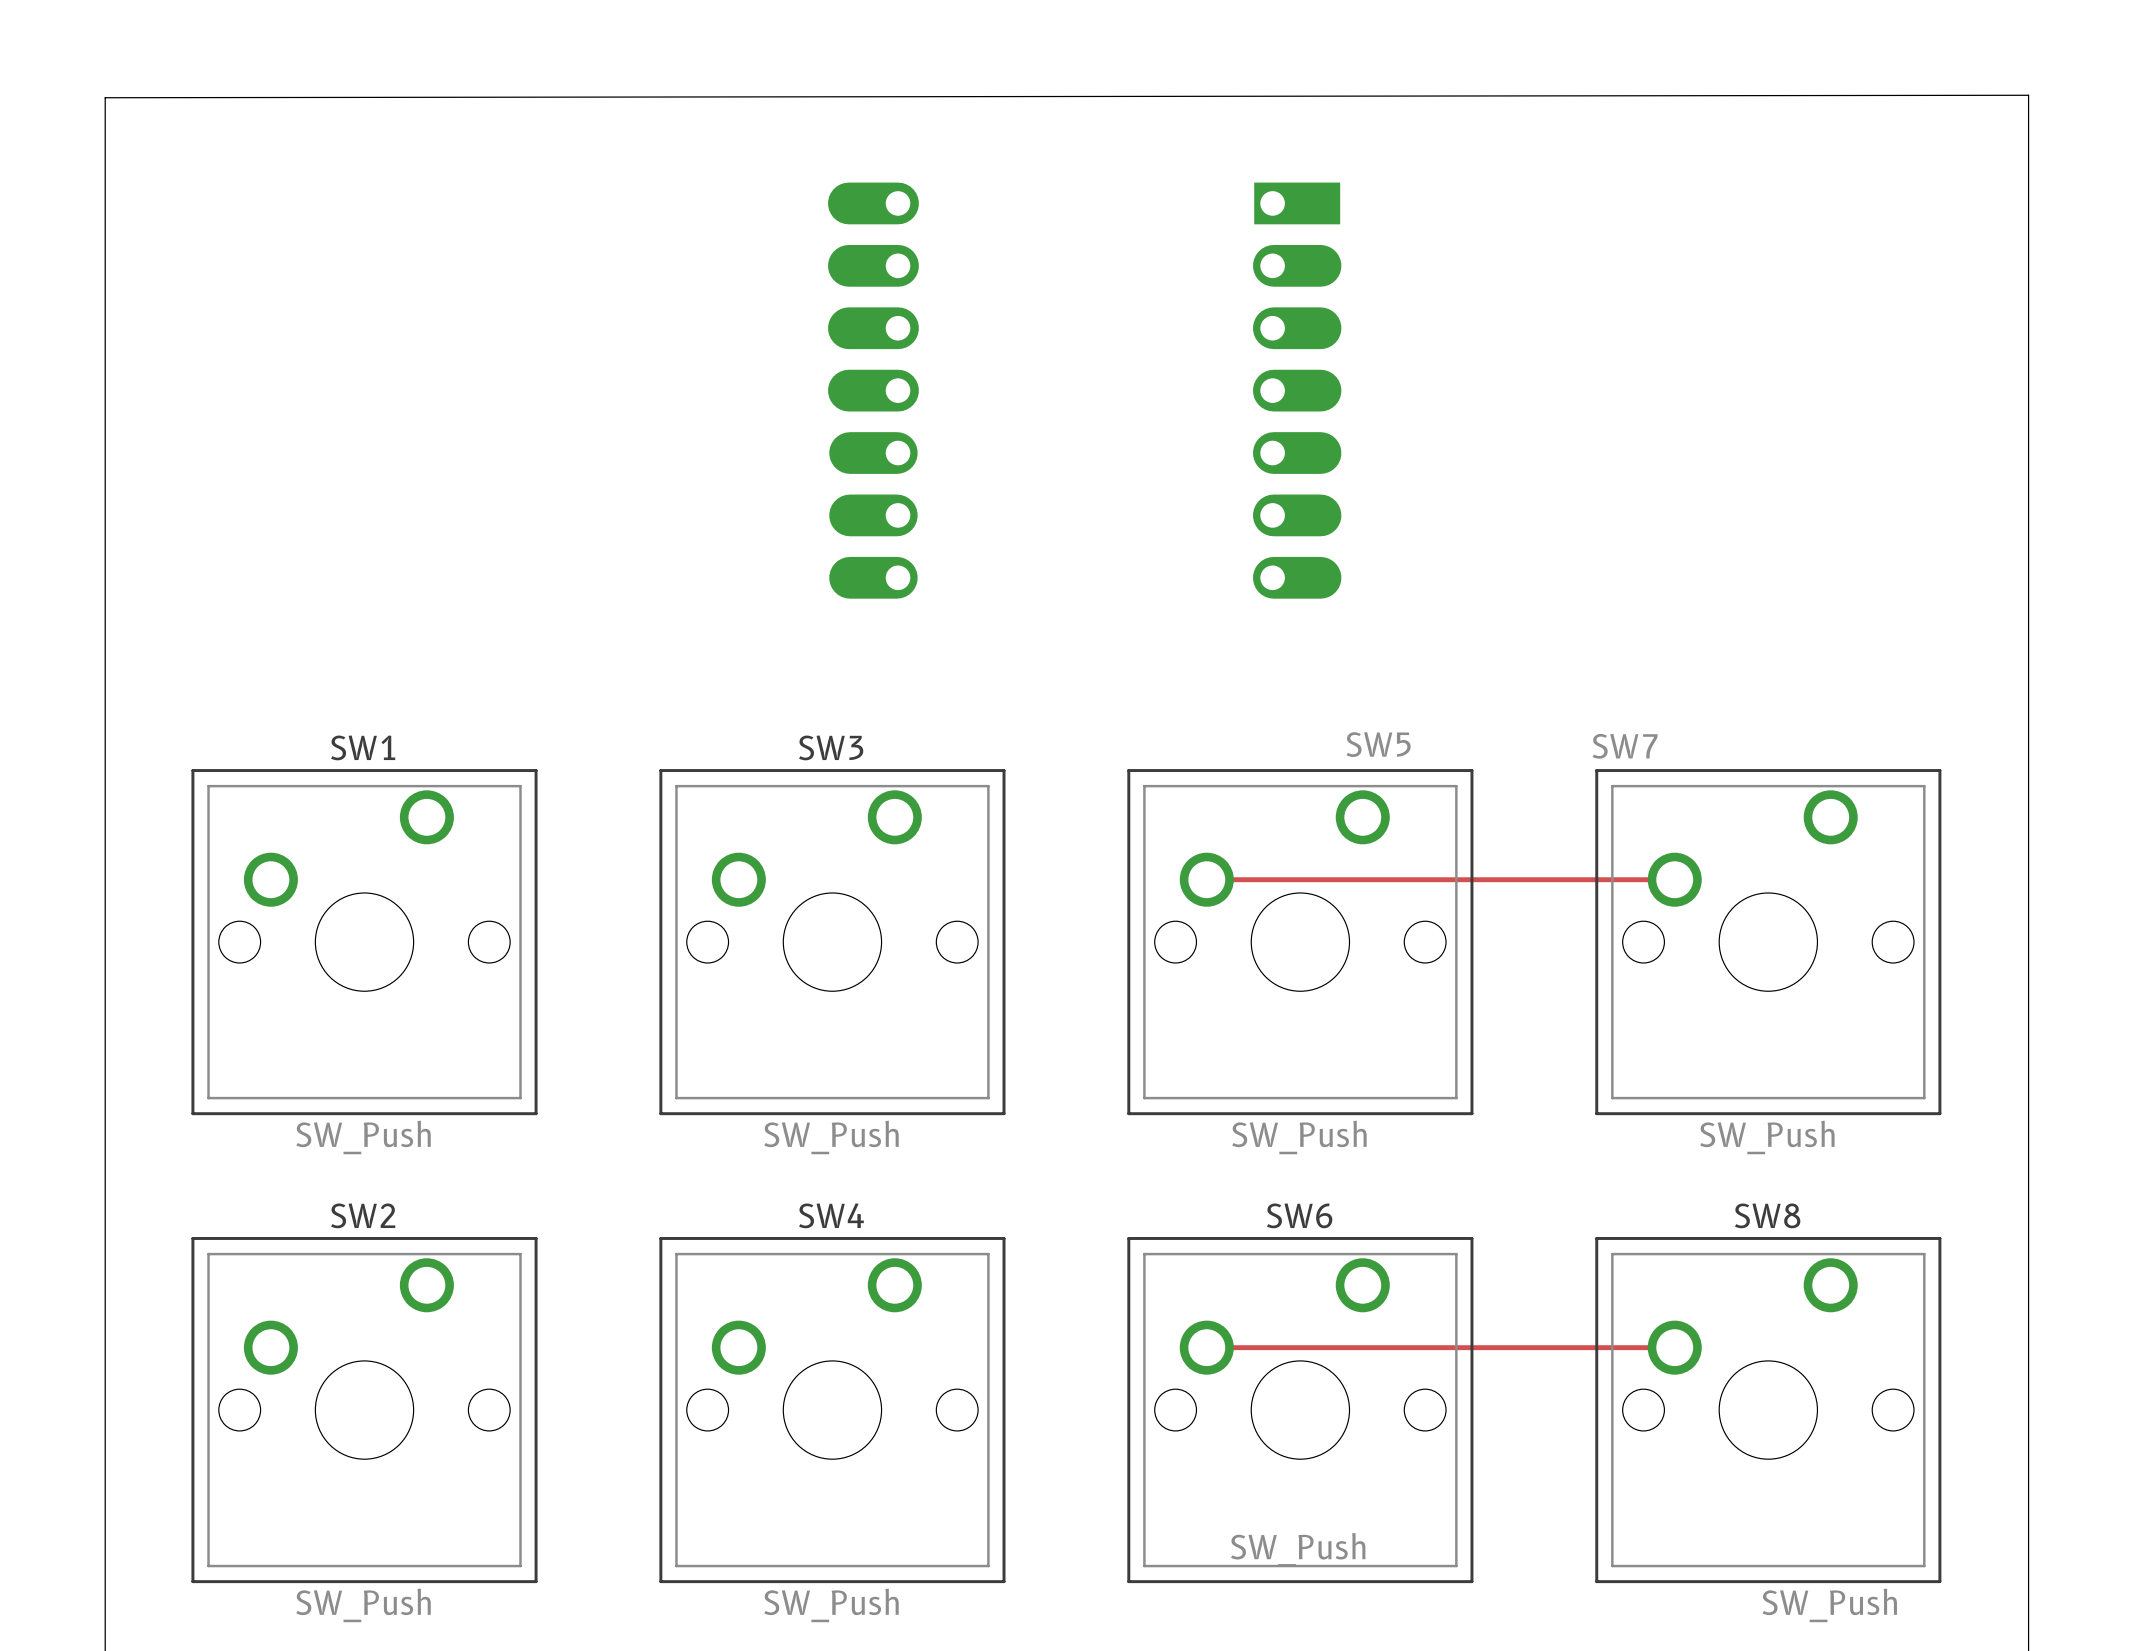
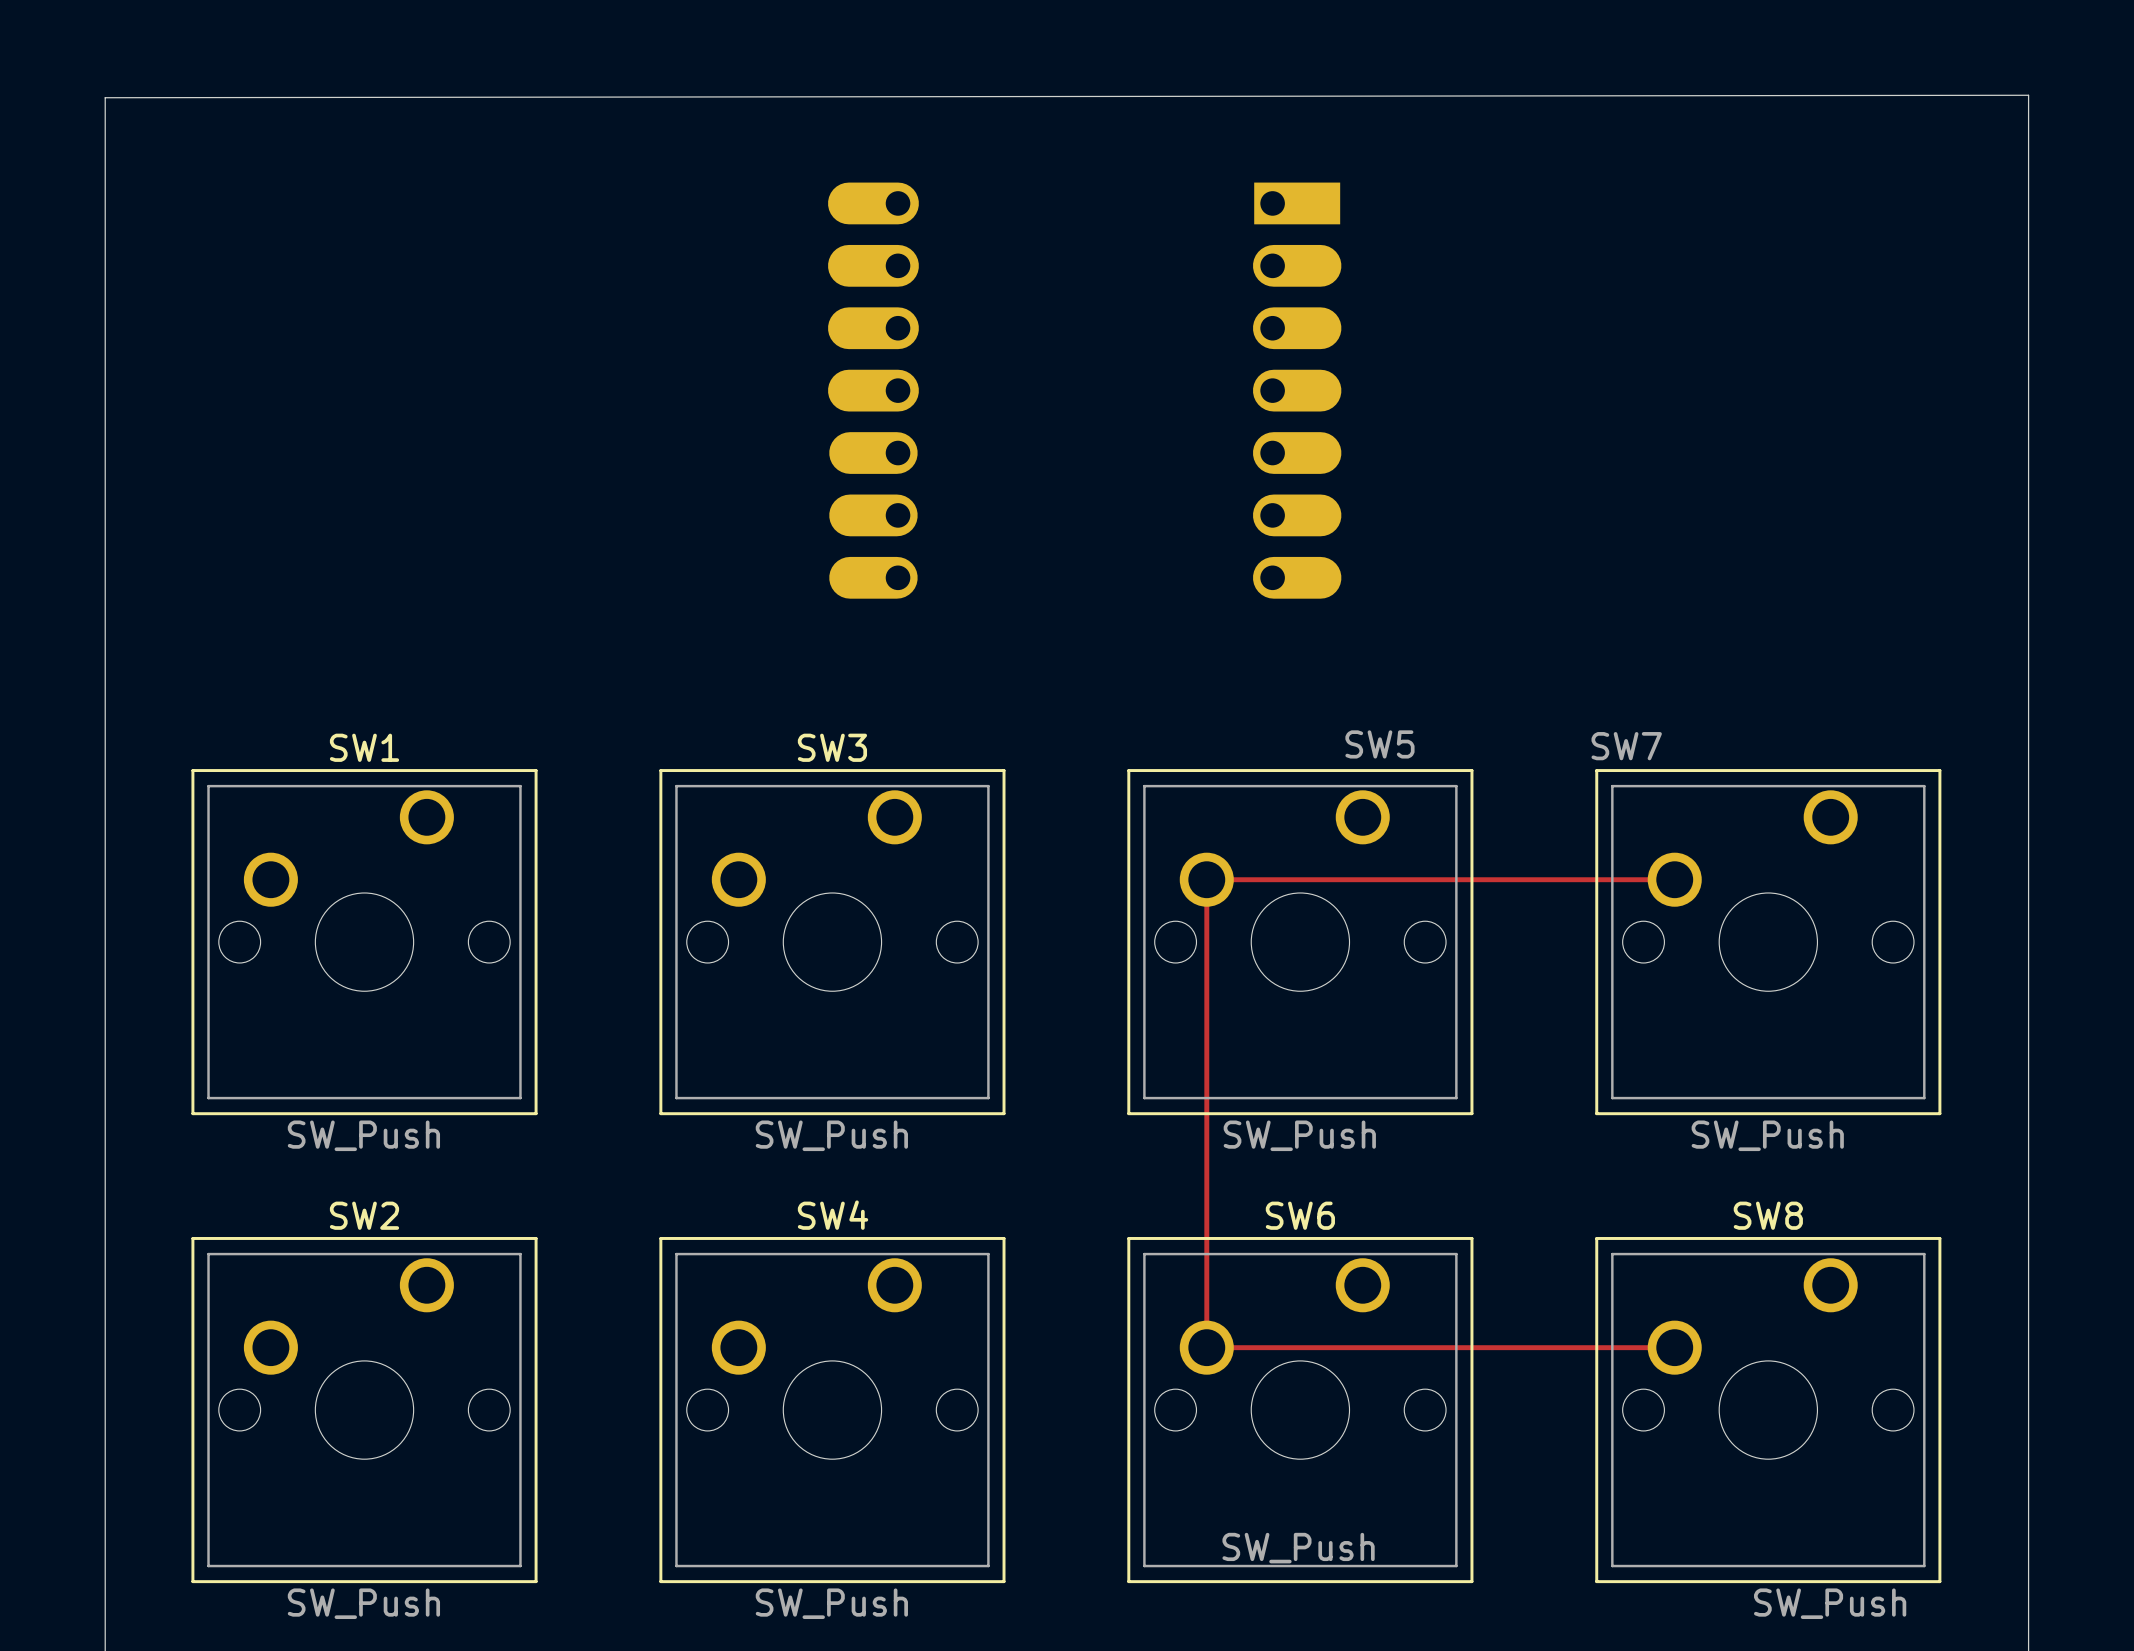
top track: none -> (1206, 879) (1206, 1347)

